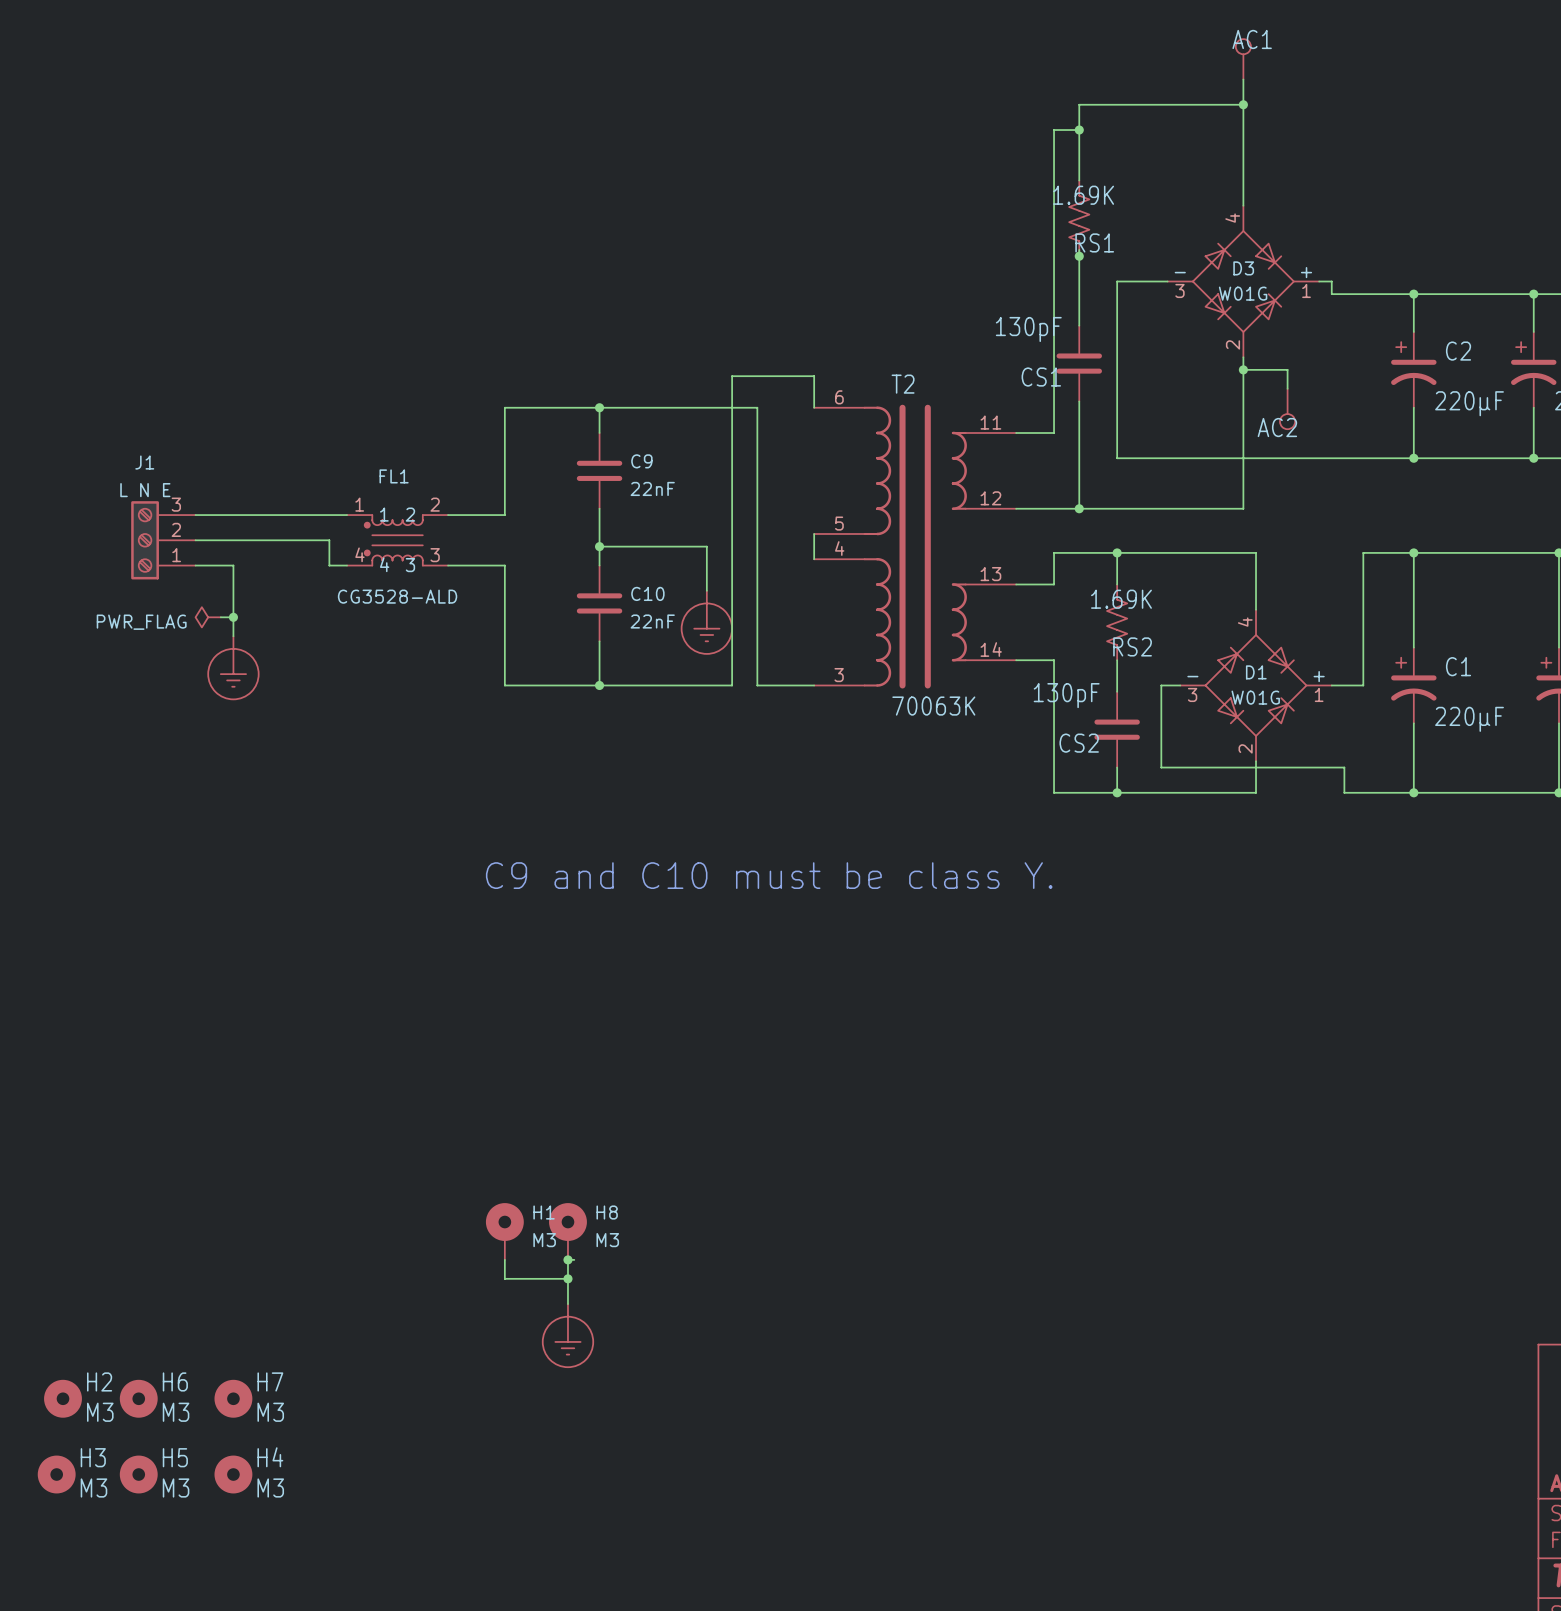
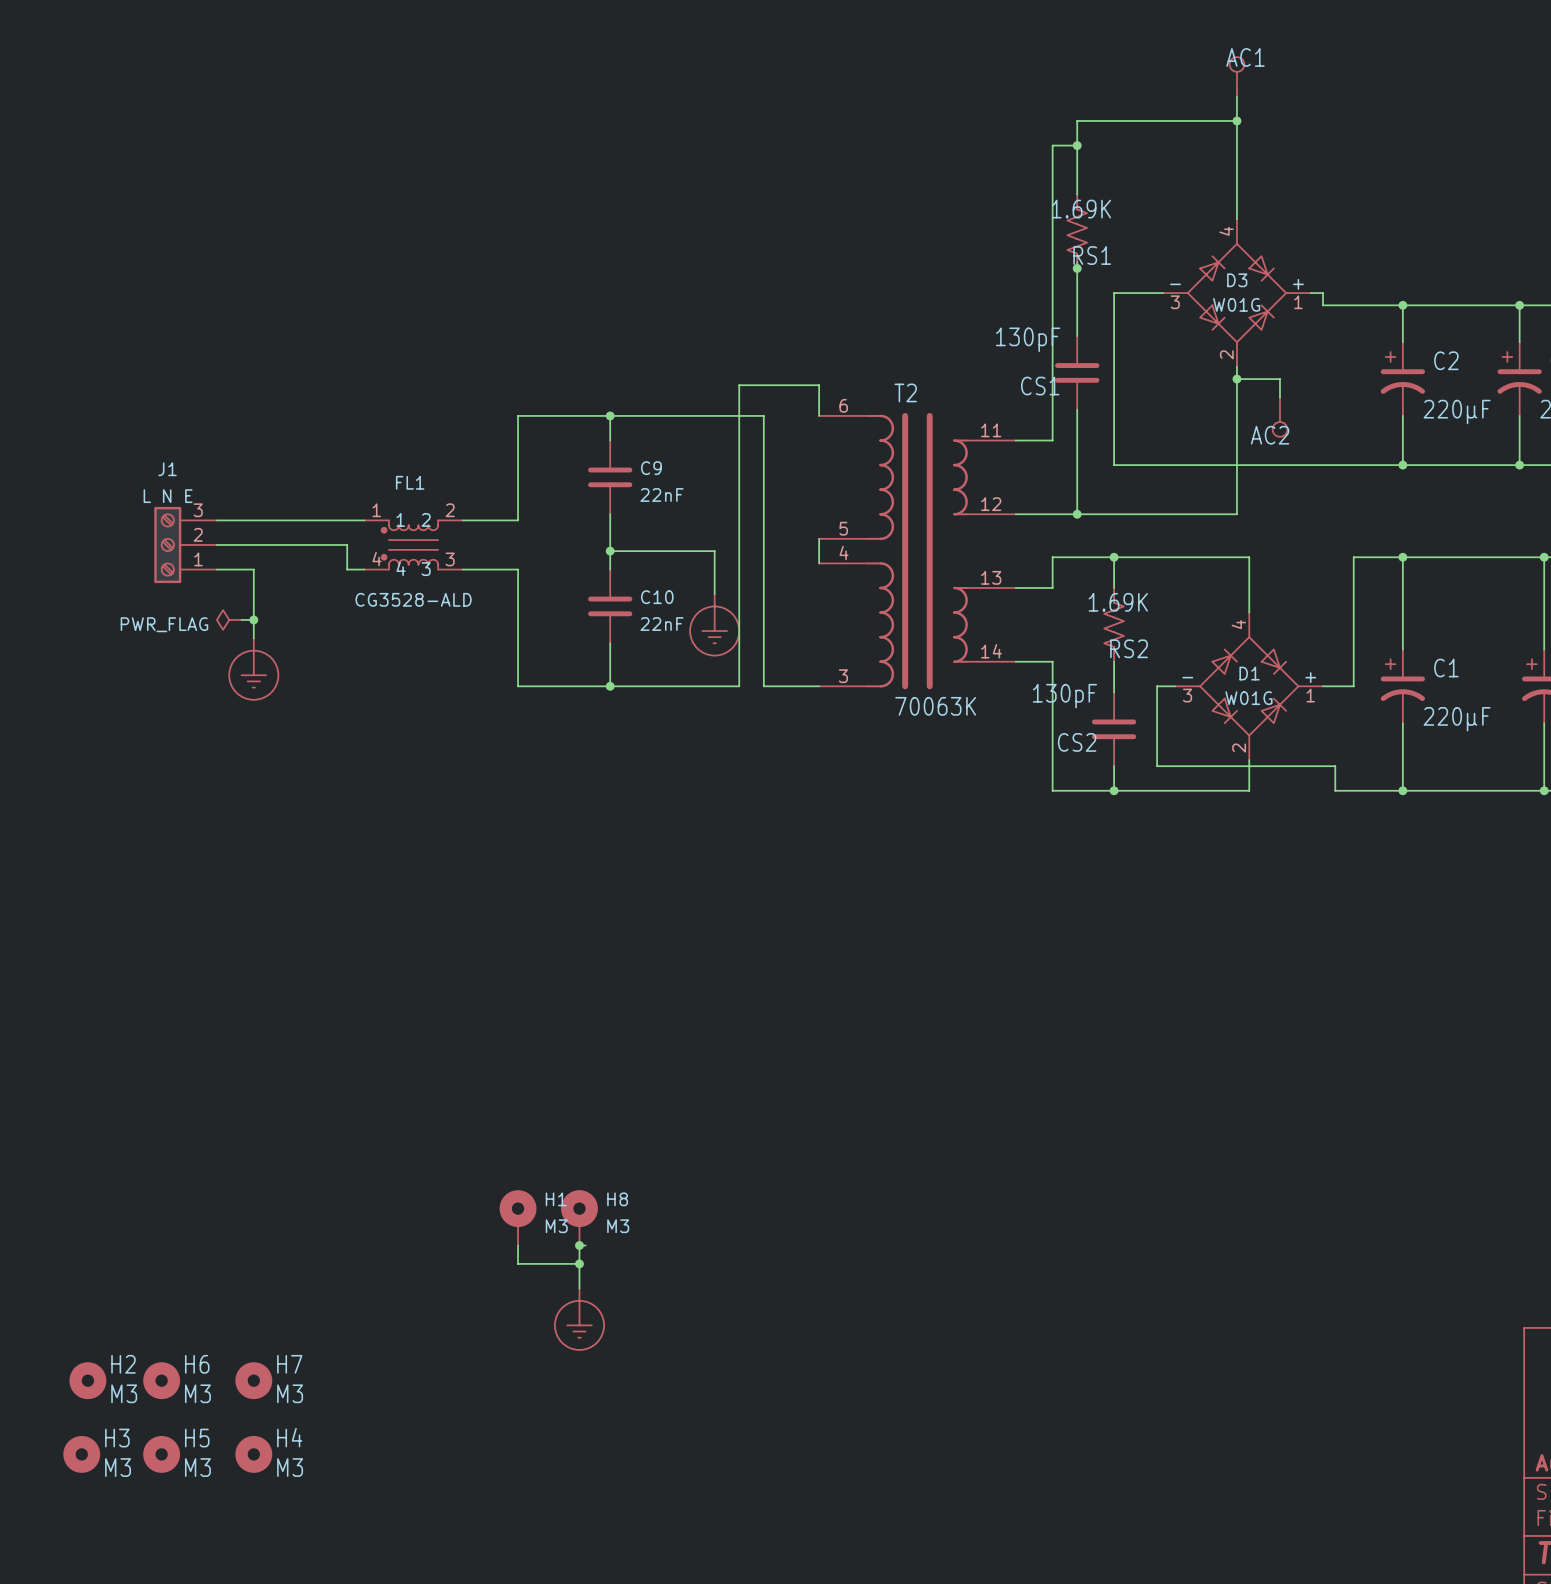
text: C9 and C10 must be class Y. (769, 875) -> none

